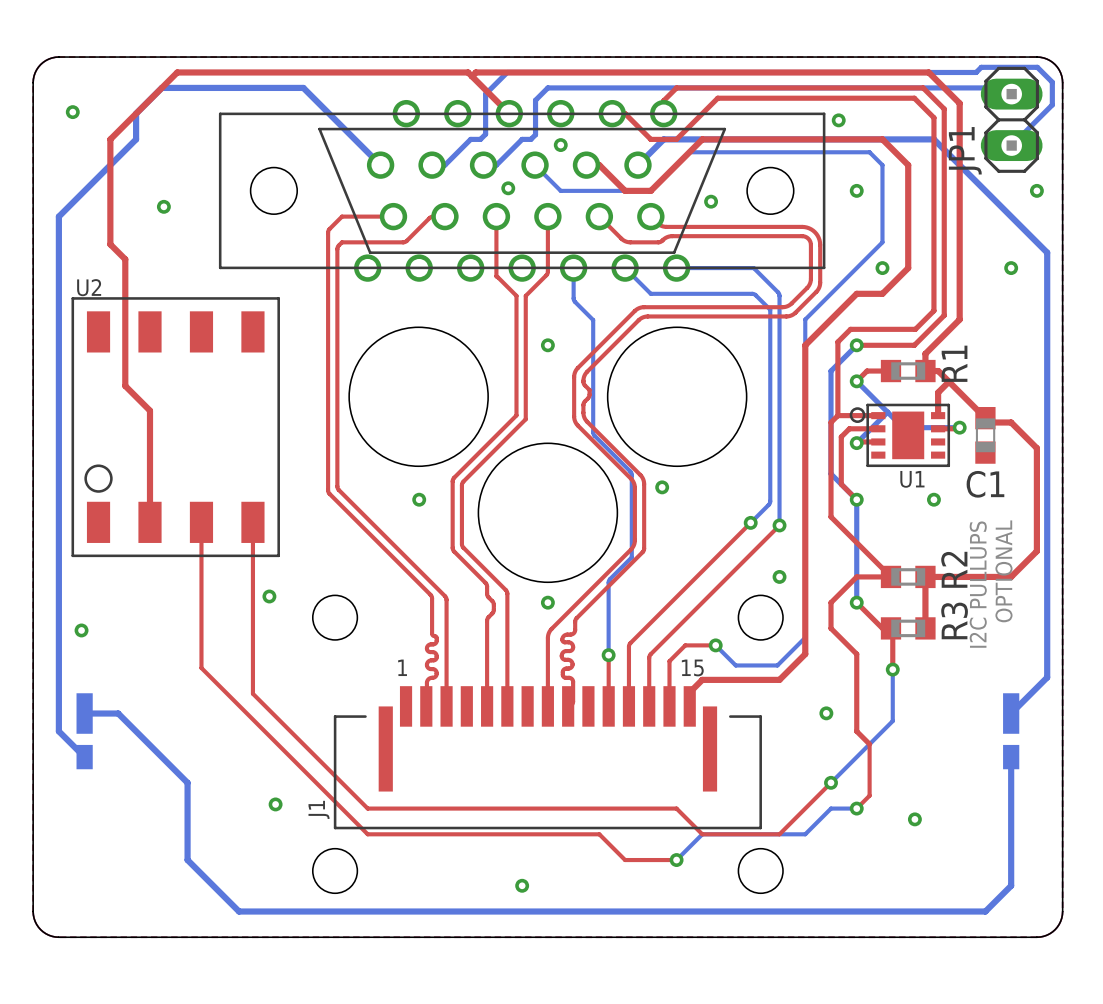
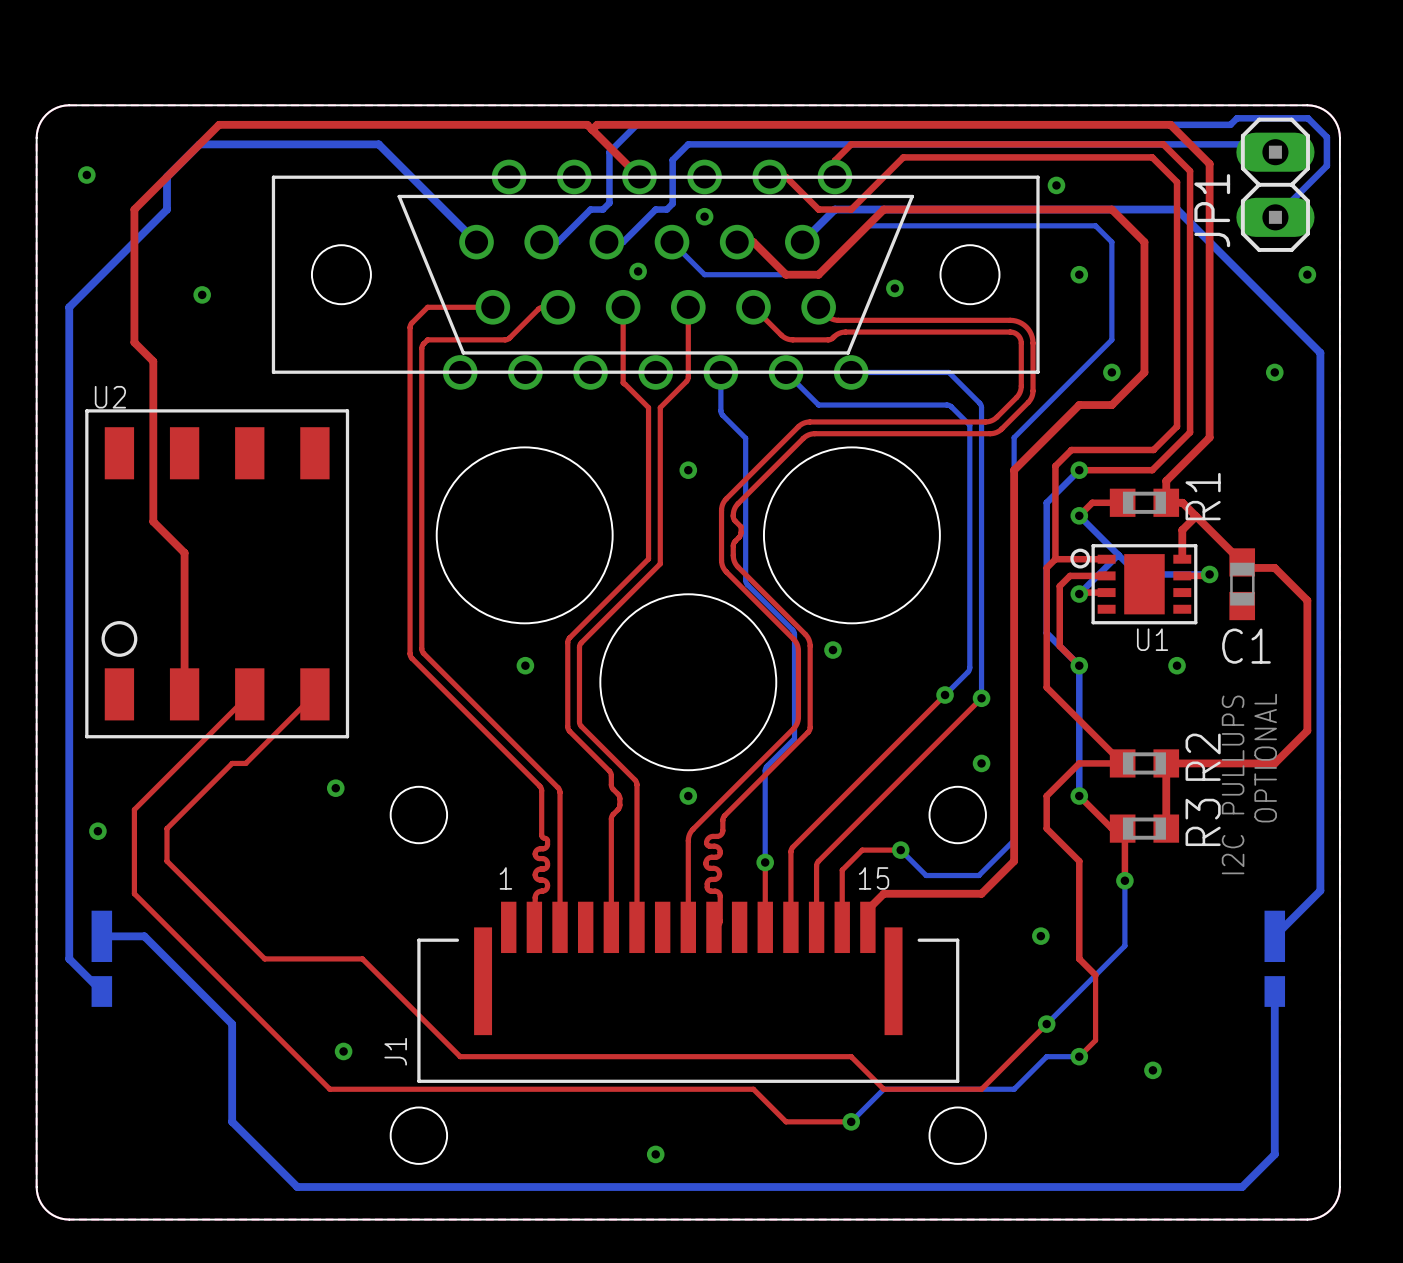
top track: (201, 522) (201, 668) (367, 834) -> (249, 694) (134, 809) (134, 893) (329, 1089) (460, 1089)
top track: (252, 522) (252, 693) (290, 731) -> (314, 694) (245, 763) (232, 763) (166, 828) (166, 861) (264, 958) (362, 958)

